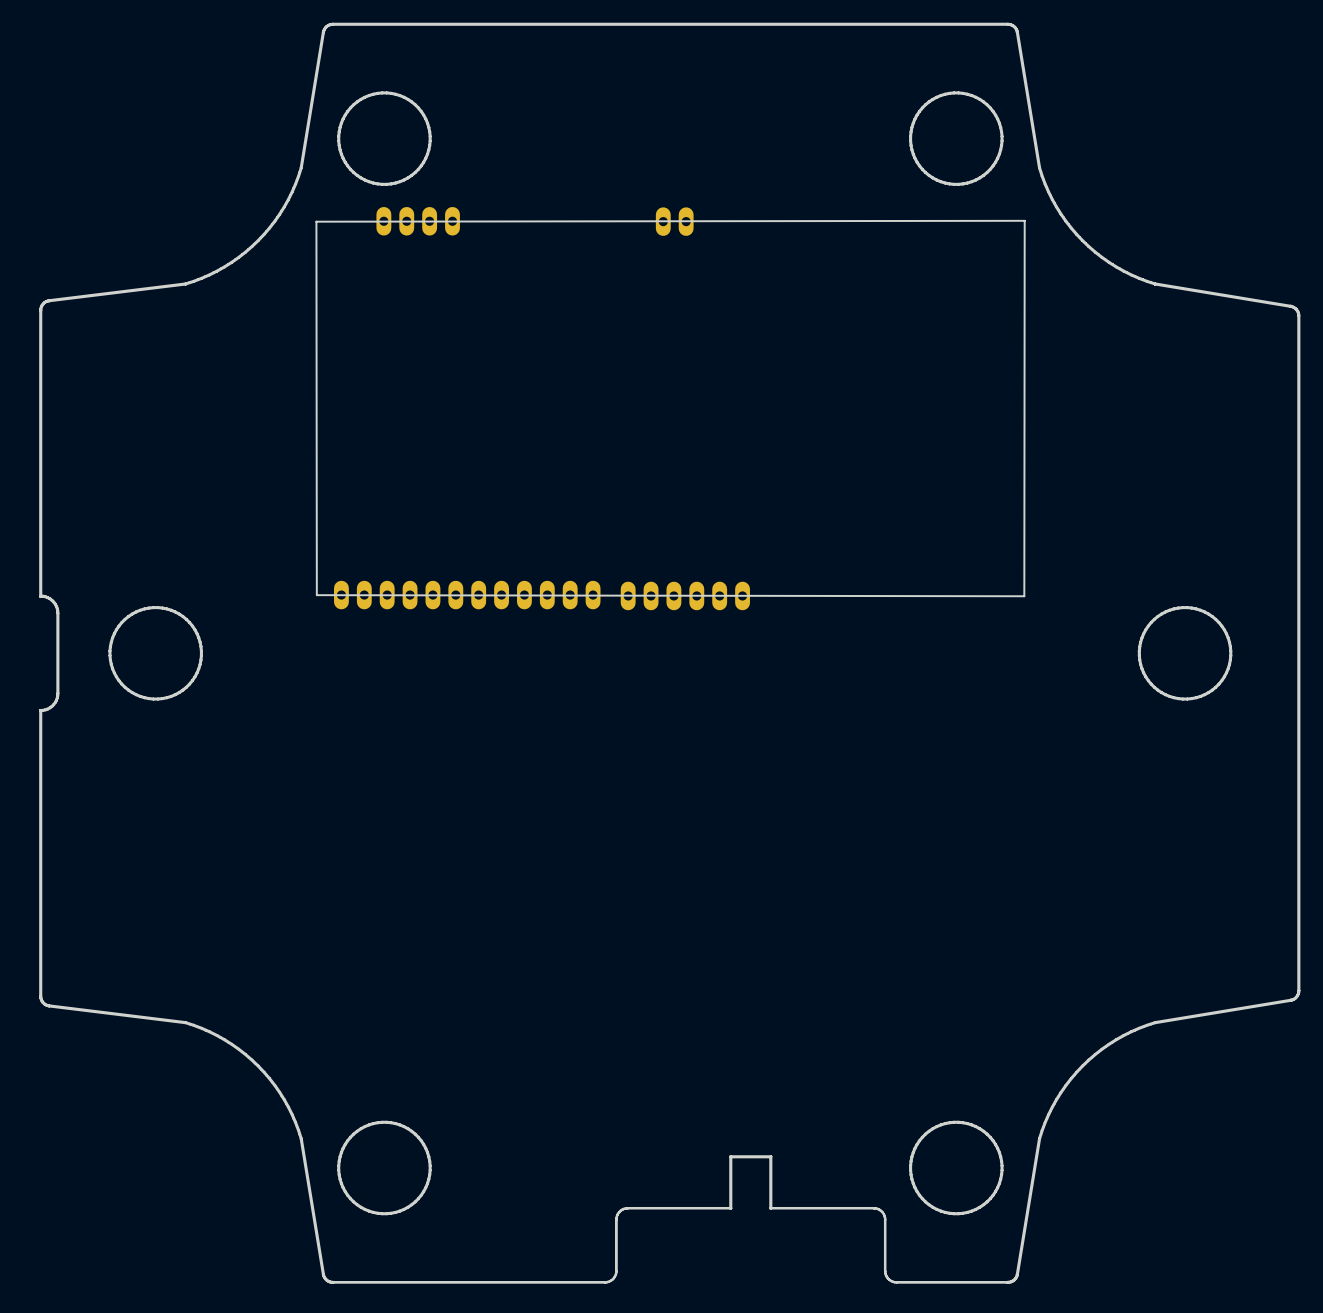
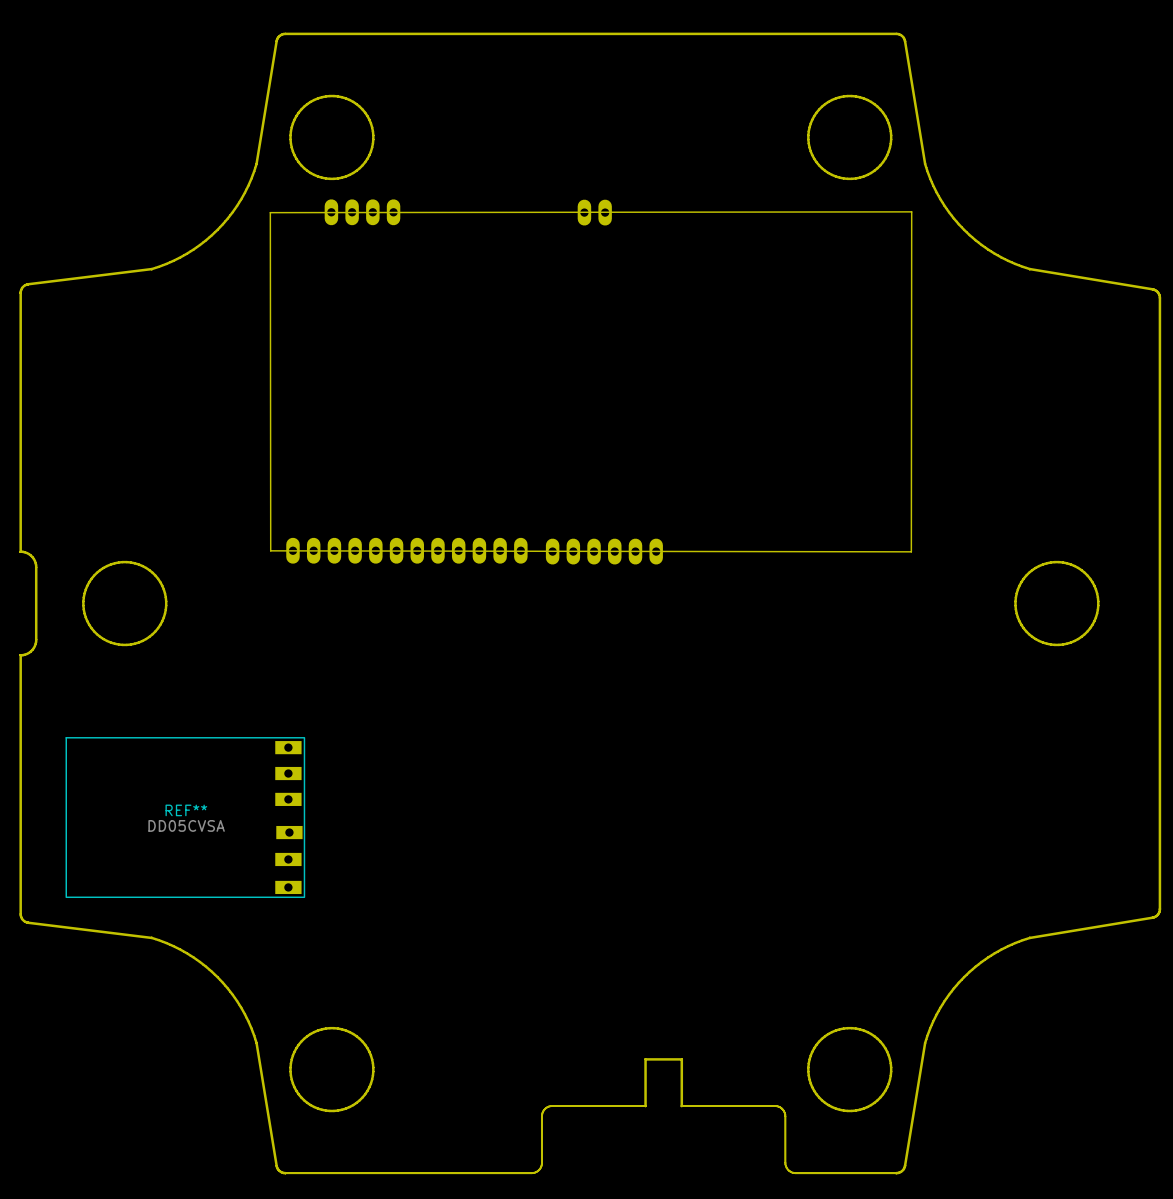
REF**: none -> DD05CVSA (185, 817)

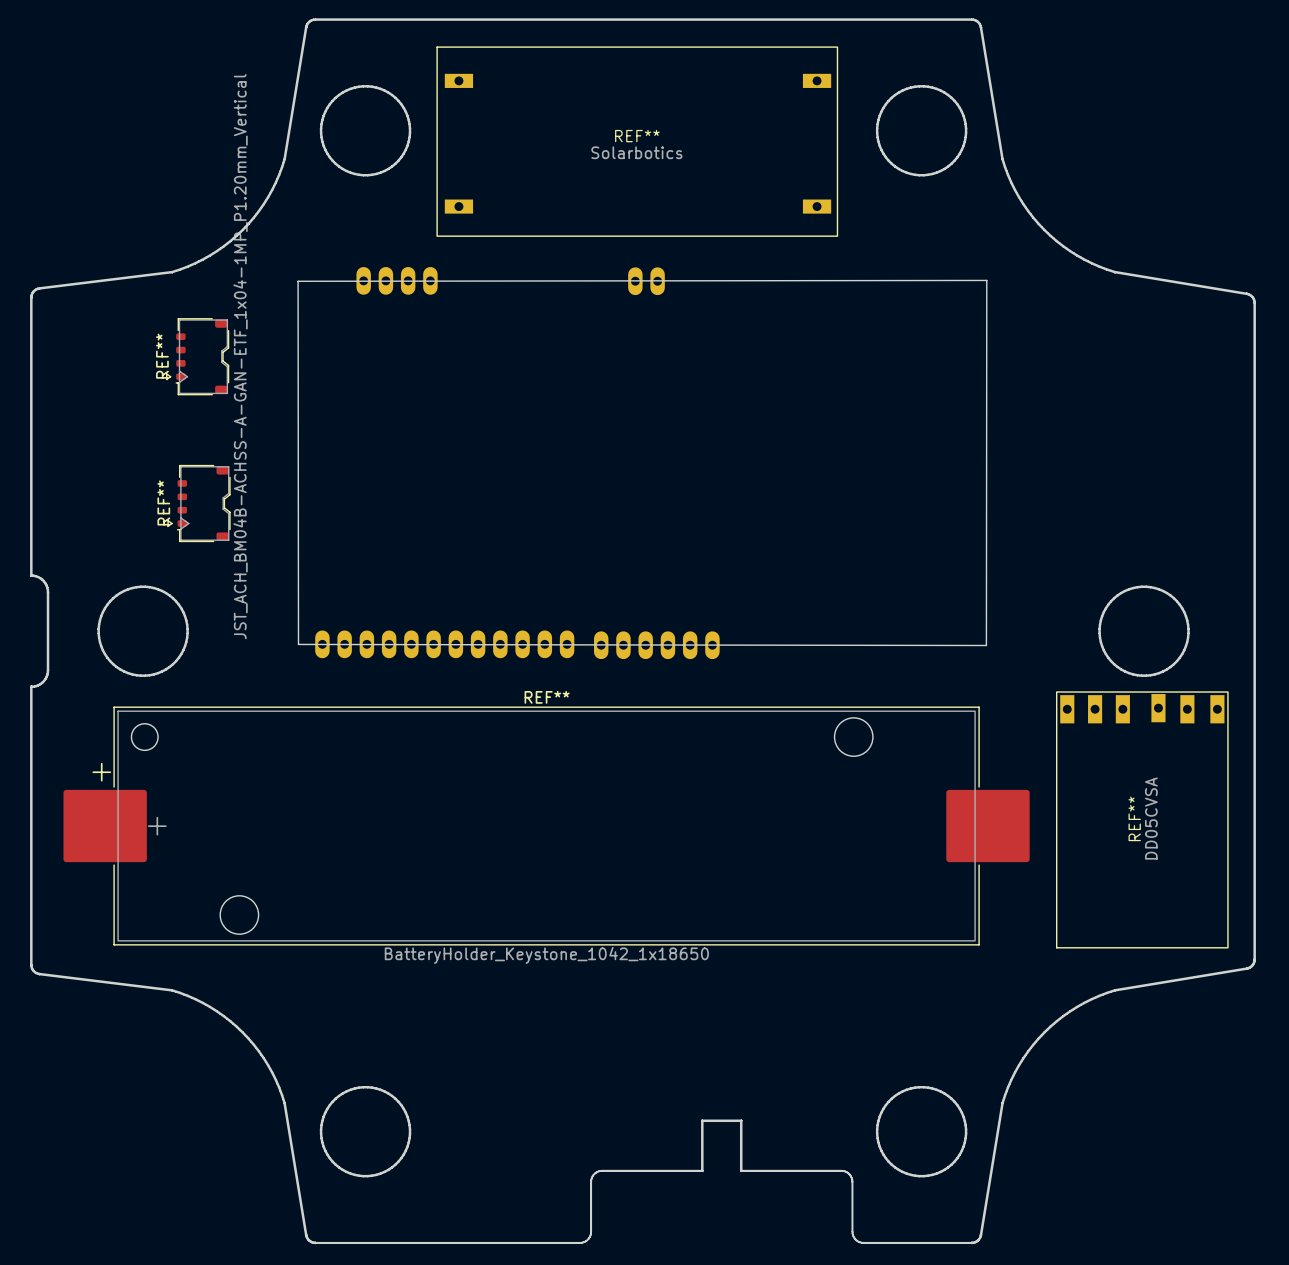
REF**: none -> Solarbotics (637, 141)
REF**: none -> JST_ACH_BM04B-ACHSS-A-GAN-ETF_1x04-1MP_P1.20mm_Vertical (197, 356)
part position: (591, 381) -> (642, 463)
REF**: none -> (199, 503)
REF**: none -> DD05CVSA (1142, 819)
REF**: none -> BatteryHolder_Keystone_1042_1x18650 (546, 826)
REF**: DD05CVSA (185, 817) -> none

